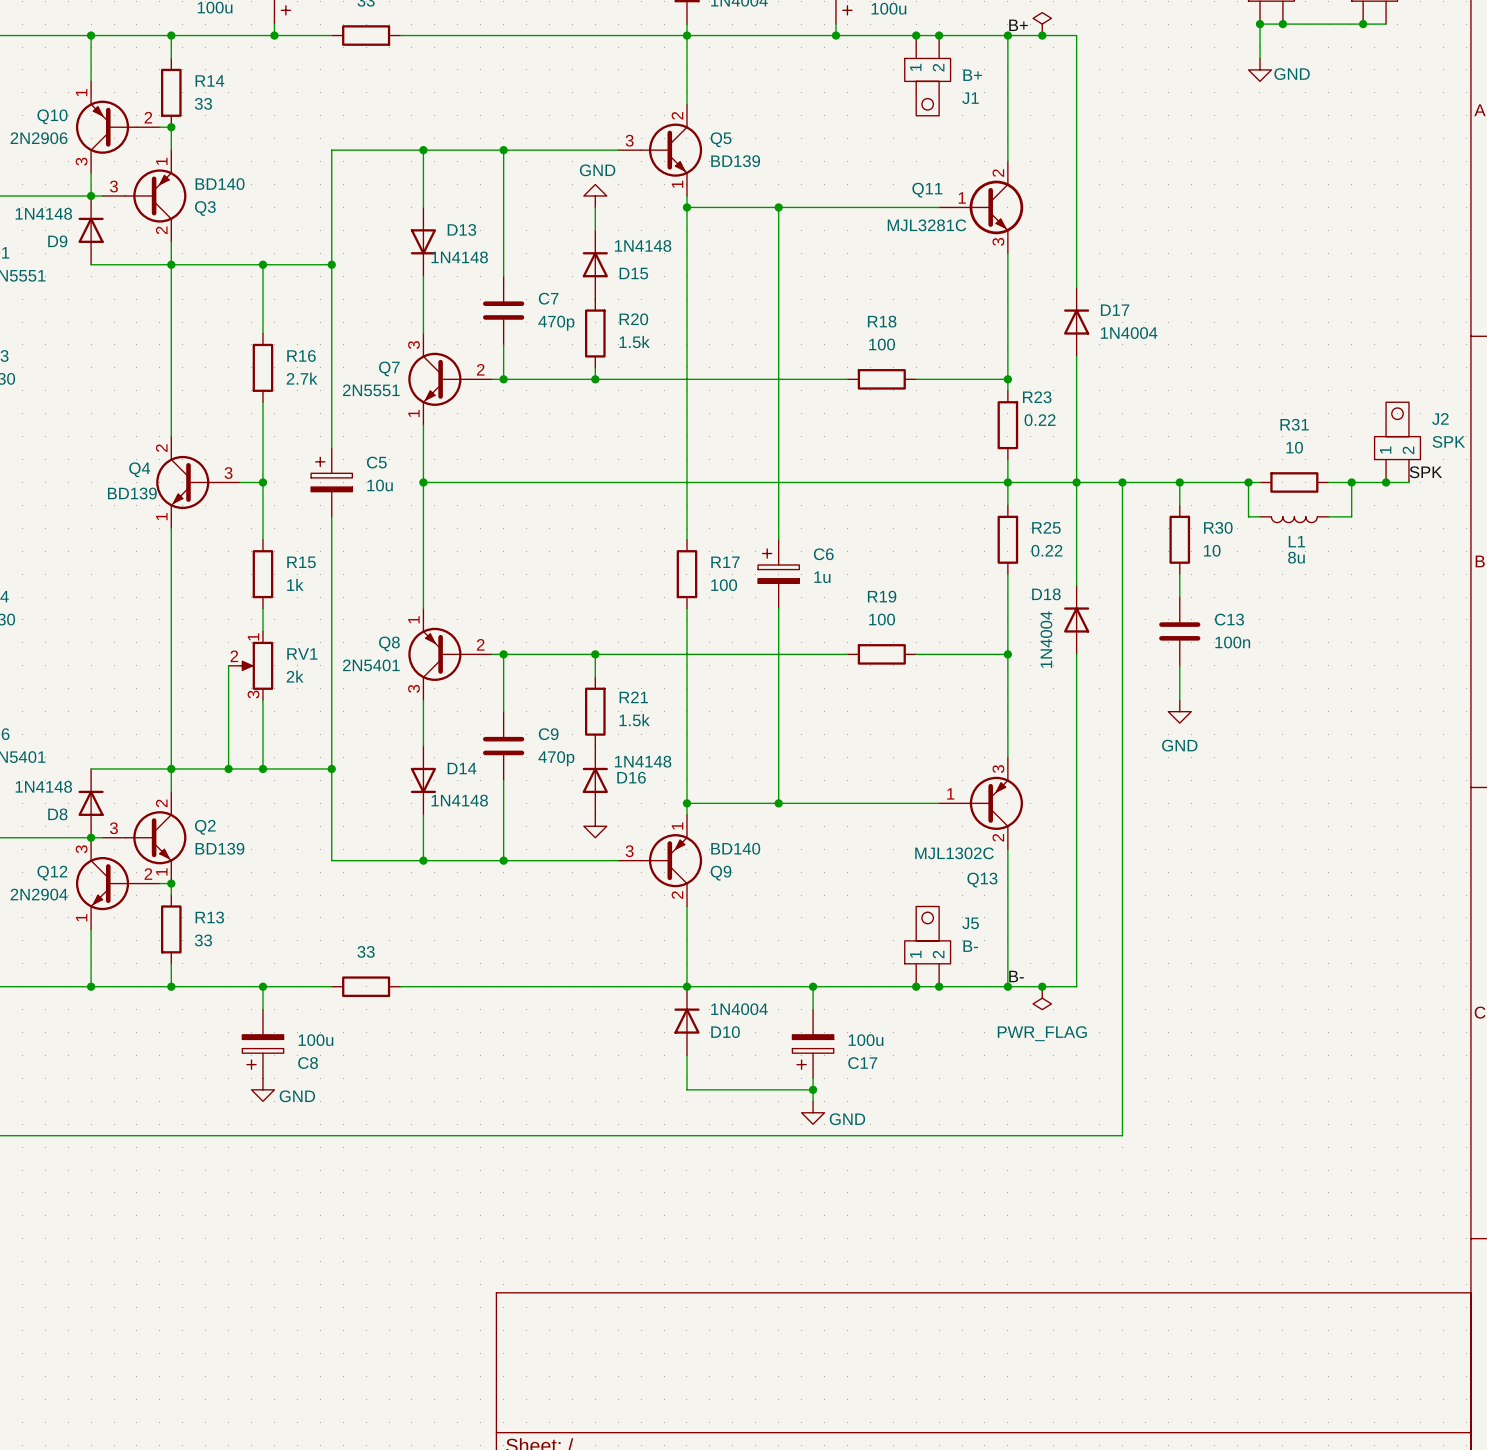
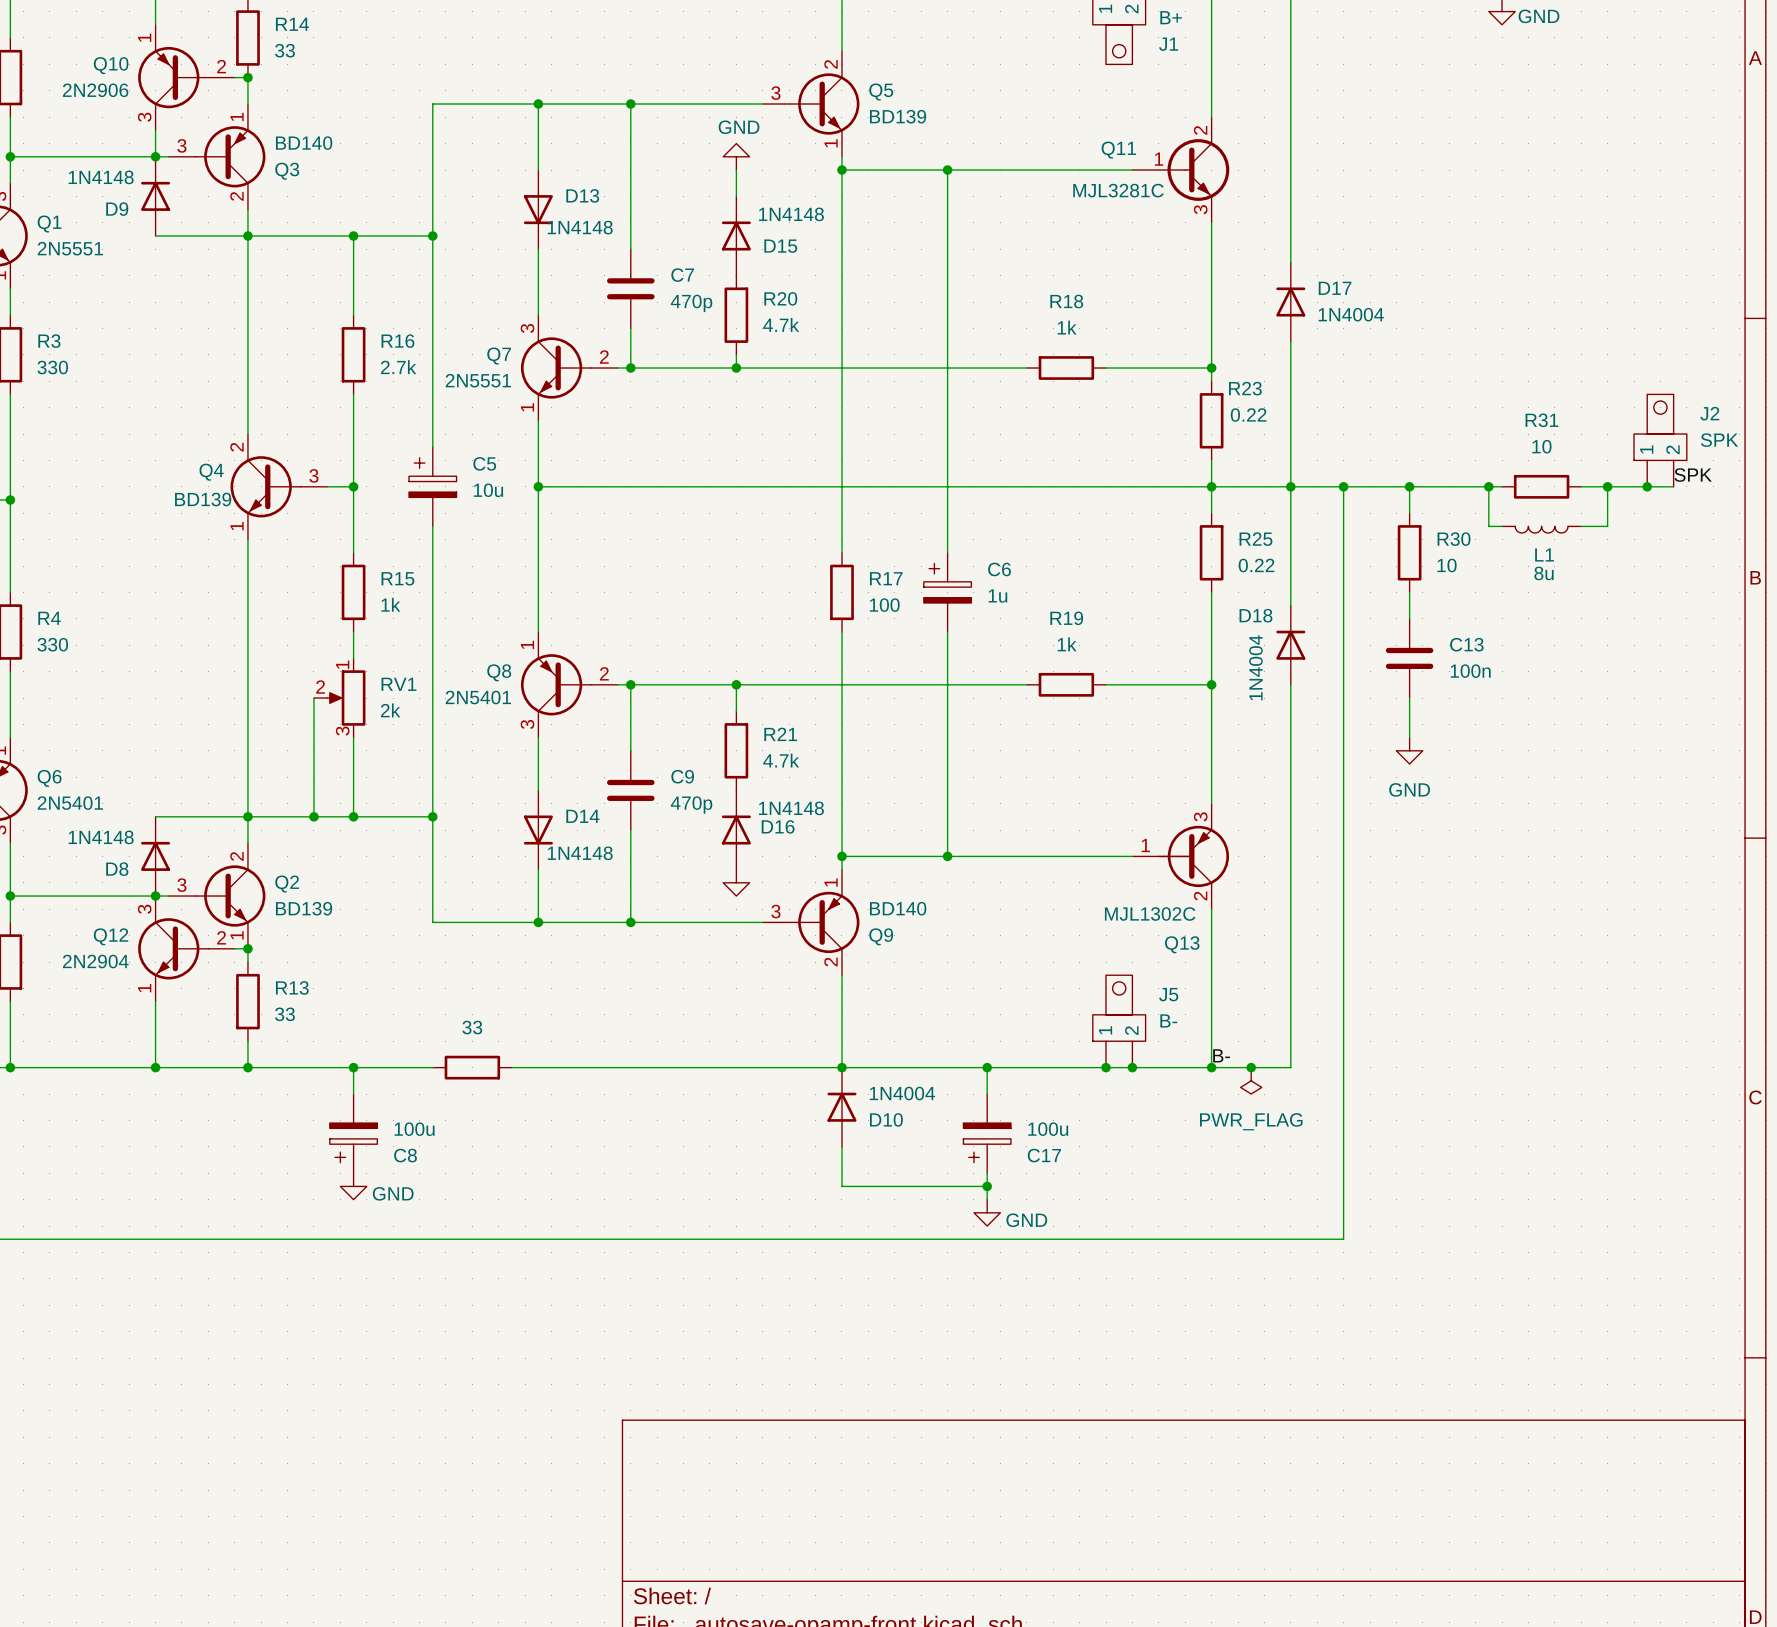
R20 value: 1.5k (634, 342) -> 4.7k (781, 324)
R18 value: 100 (882, 344) -> 1k (1067, 327)
R19 value: 100 (882, 619) -> 1k (1067, 644)
R21 value: 1.5k (634, 720) -> 4.7k (781, 760)

